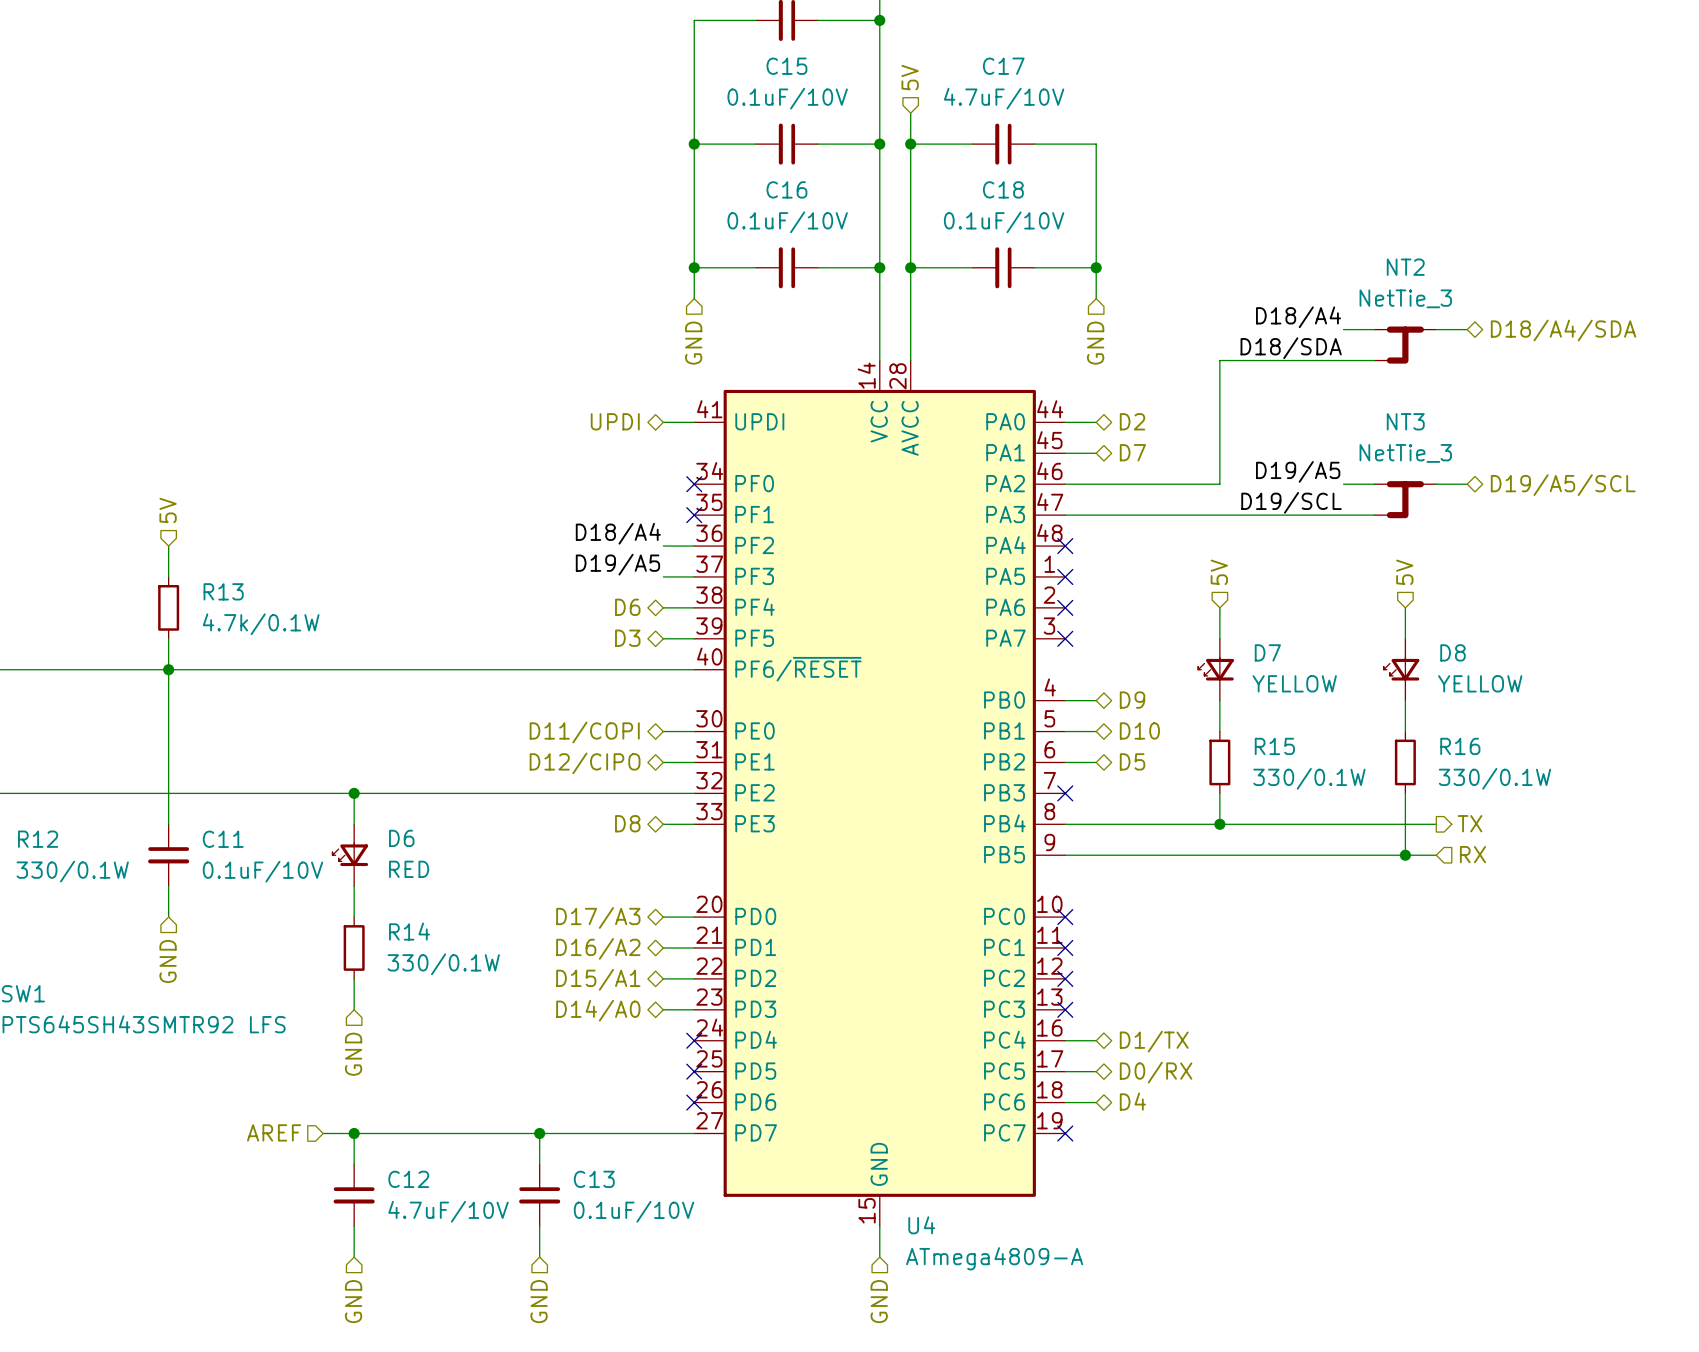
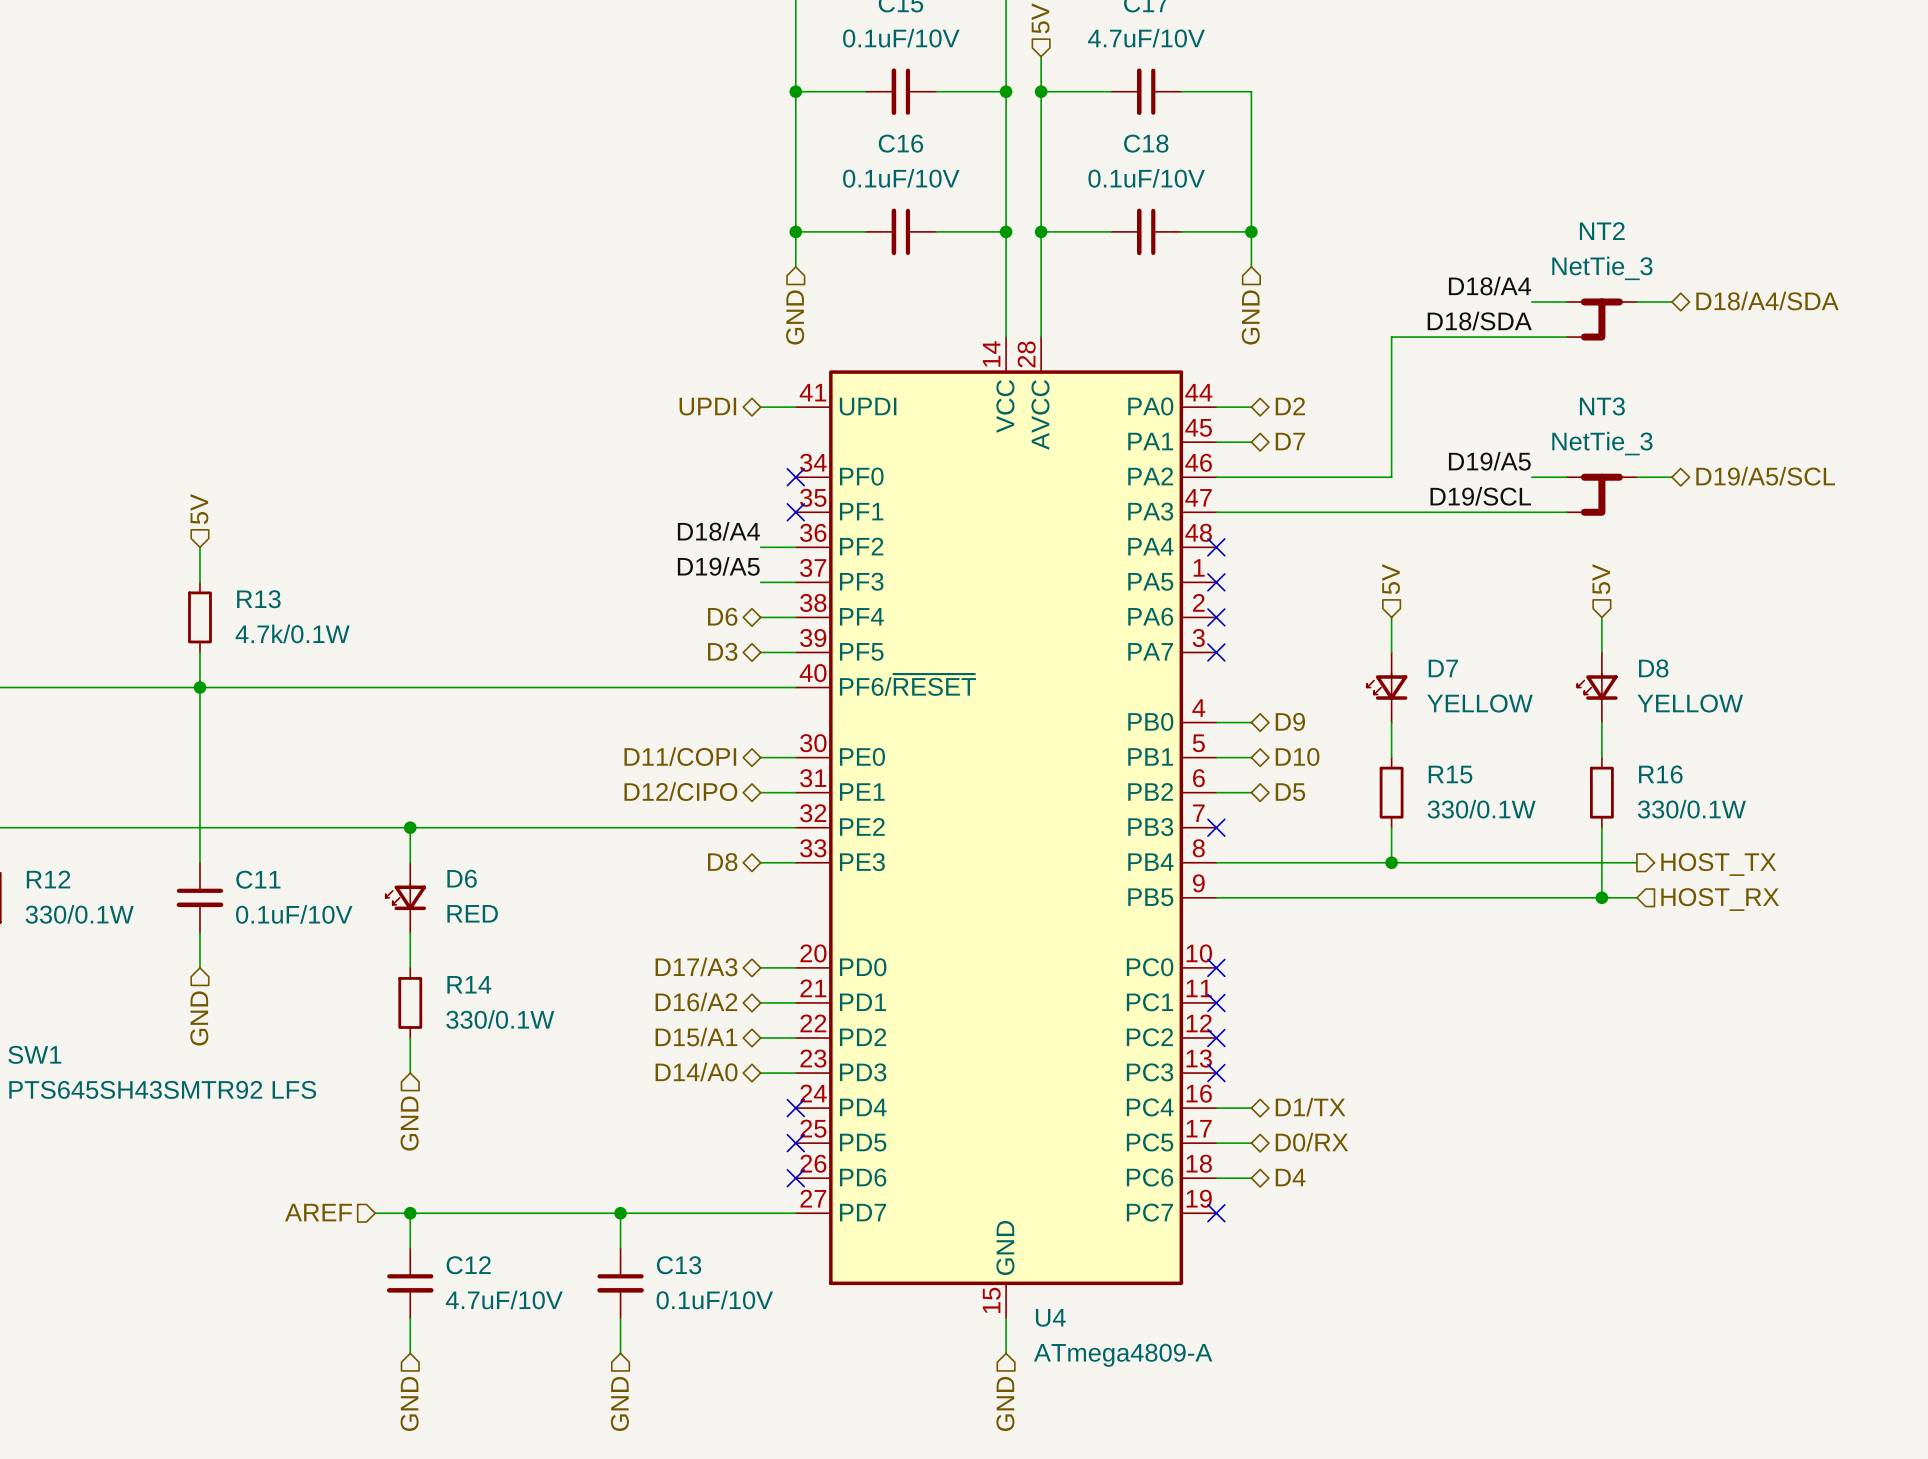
hierarchical label: TX (1470, 823) -> HOST_TX (1718, 864)
hierarchical label: RX (1472, 854) -> HOST_RX (1720, 899)

